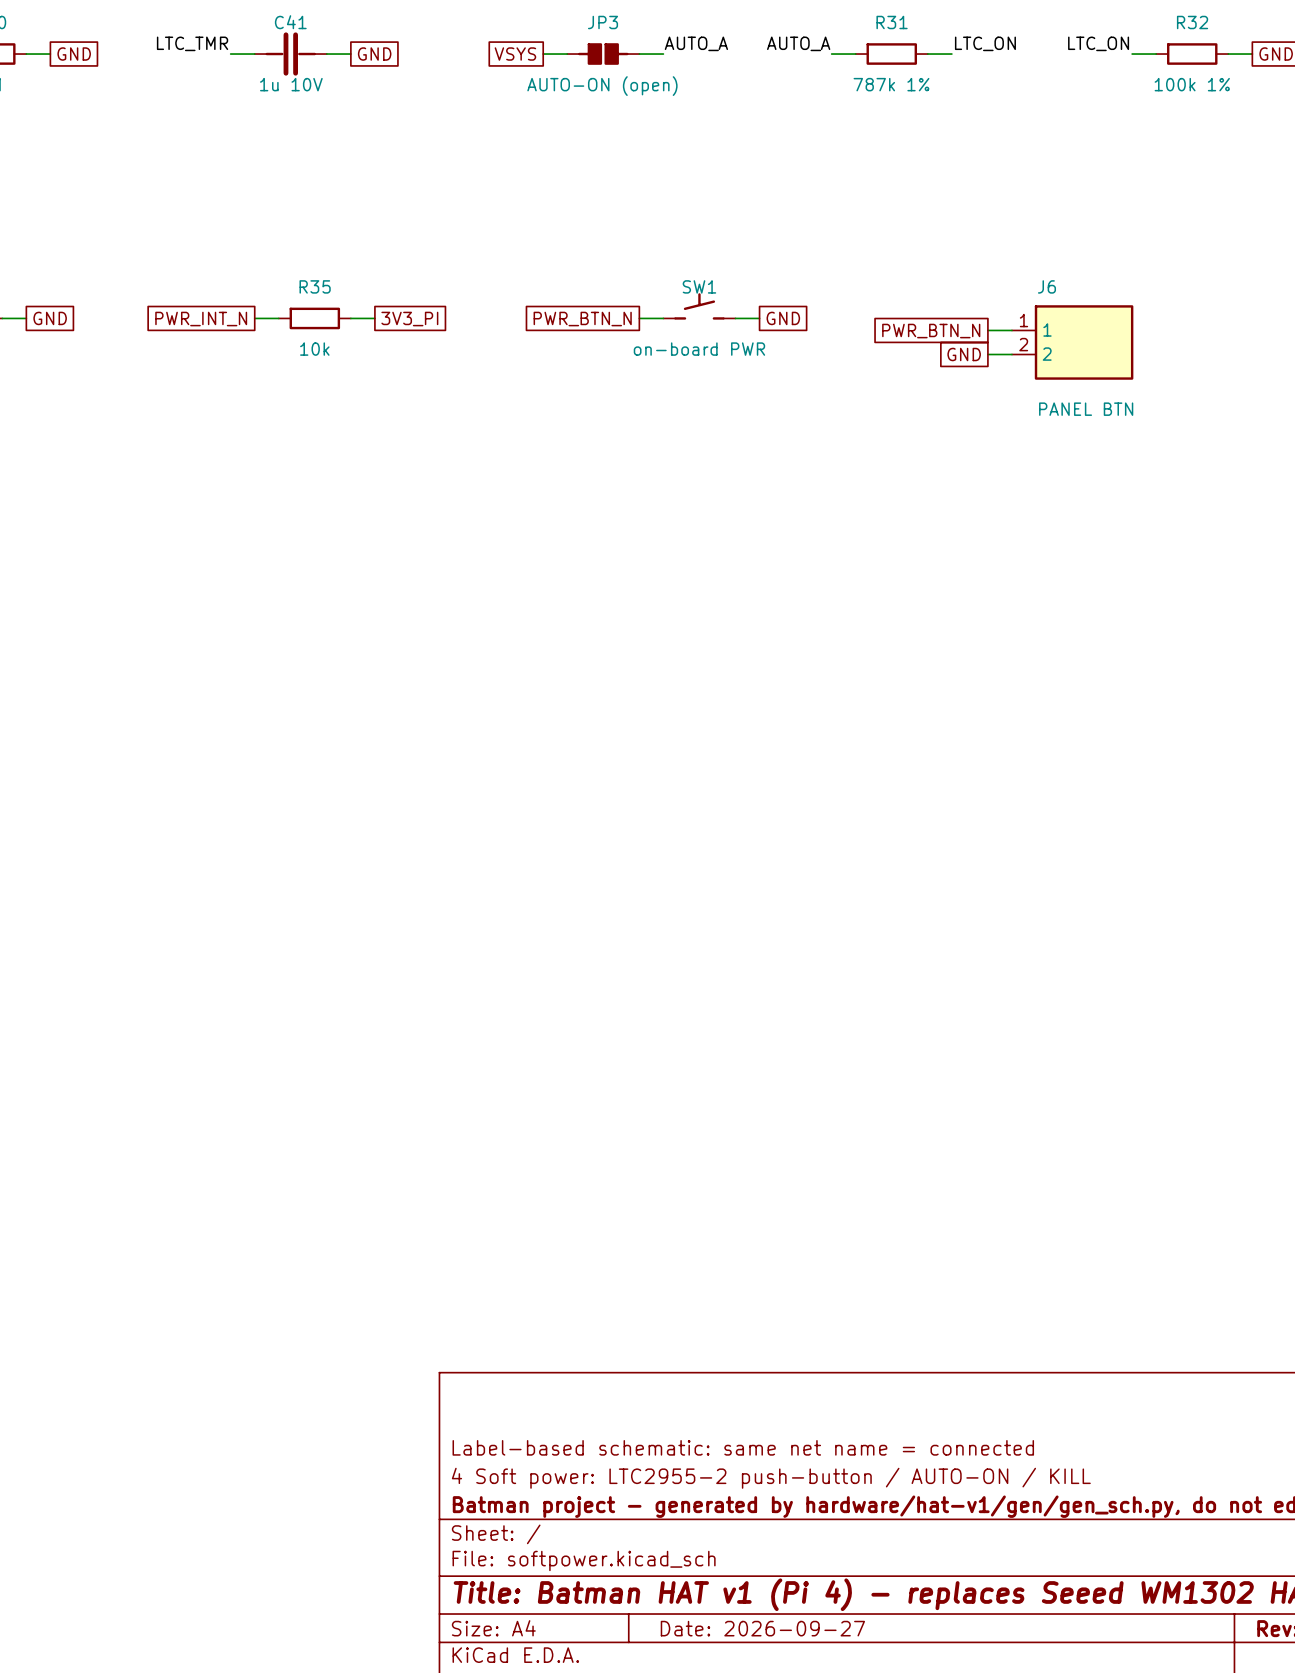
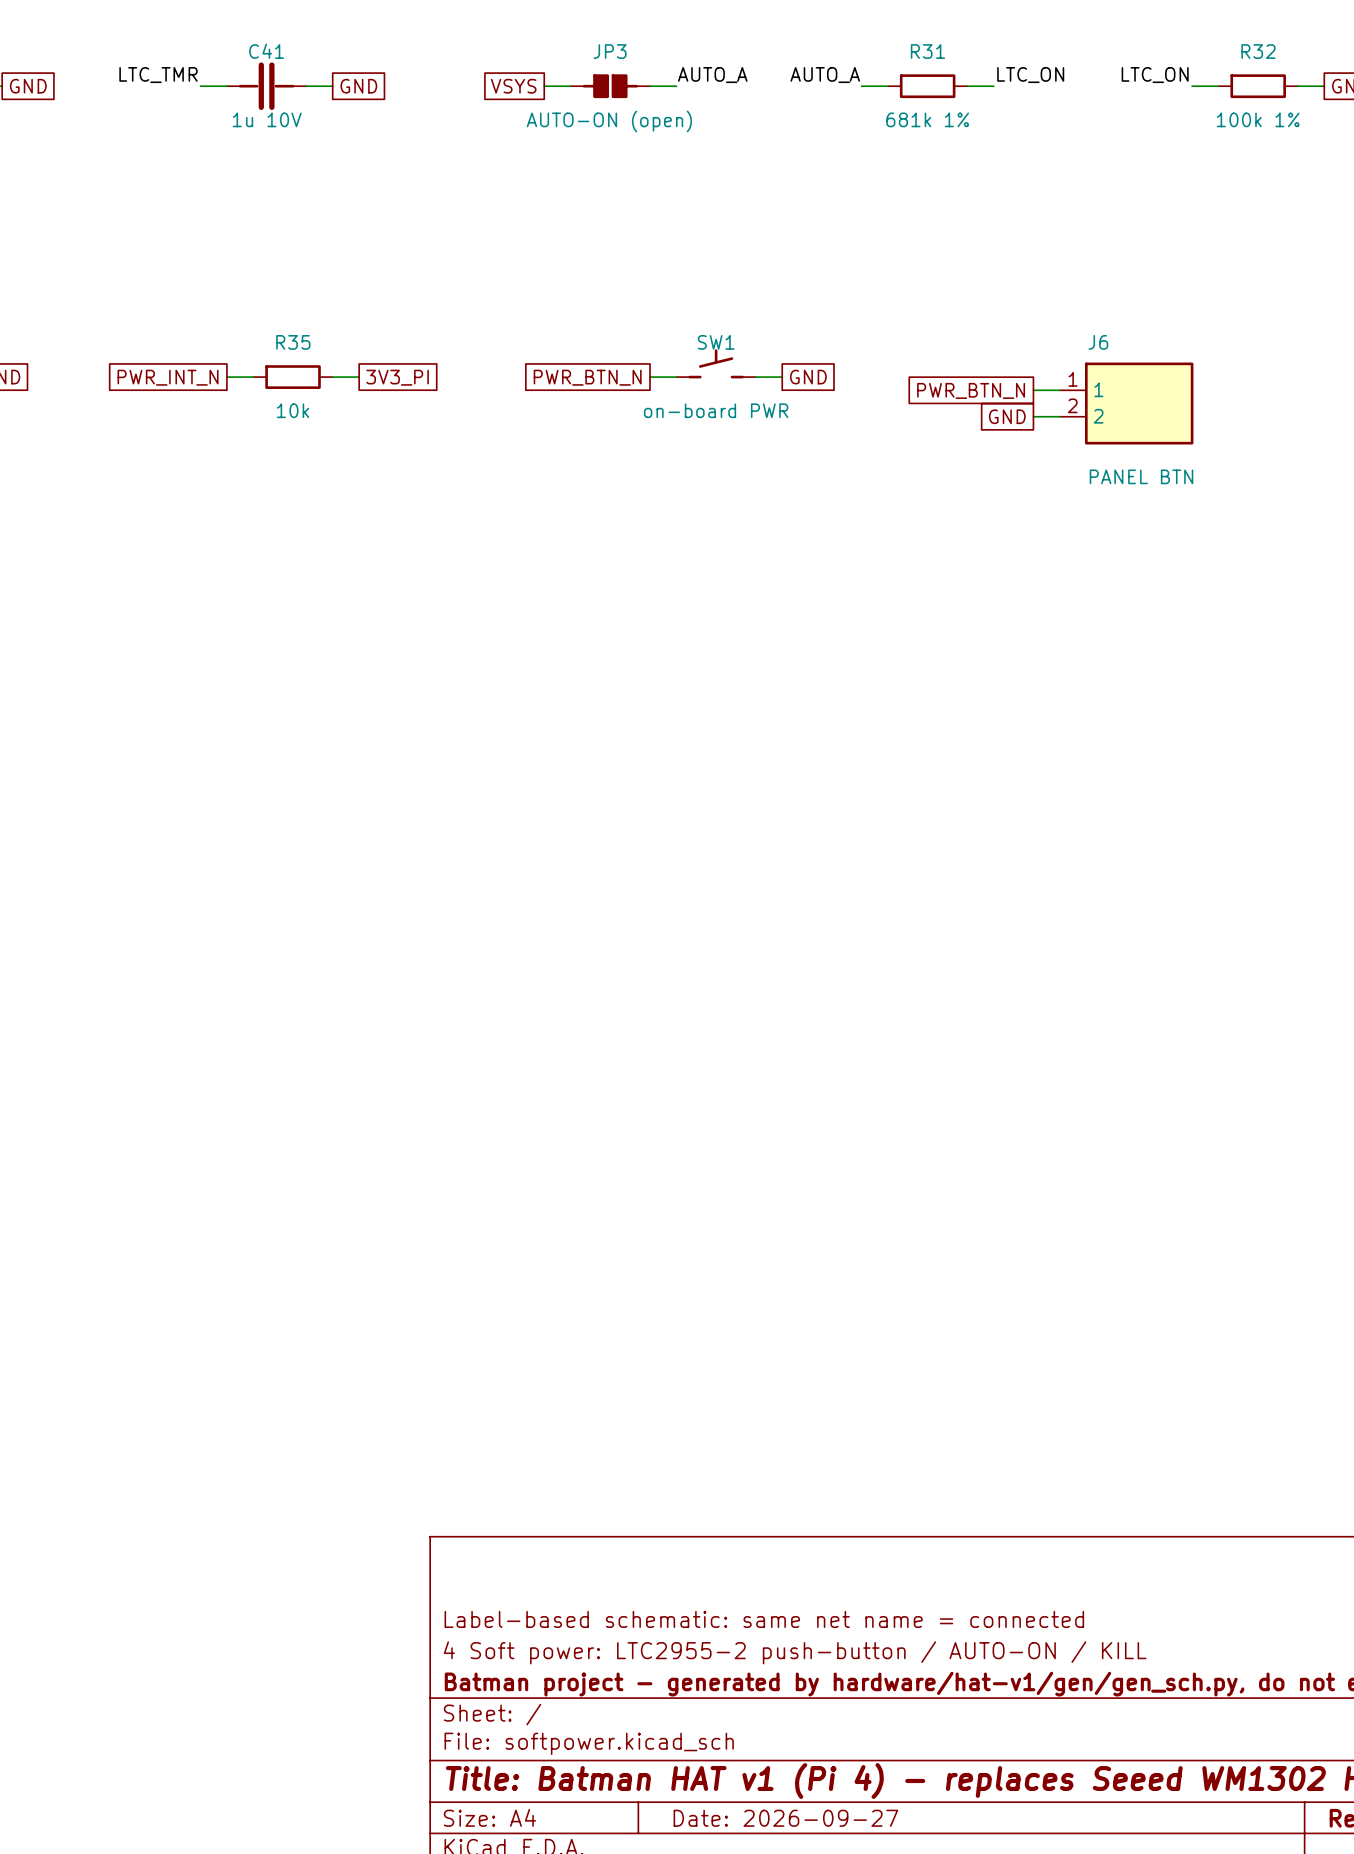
R31 value: 787k 1% (891, 84) -> 681k 1% (927, 119)

